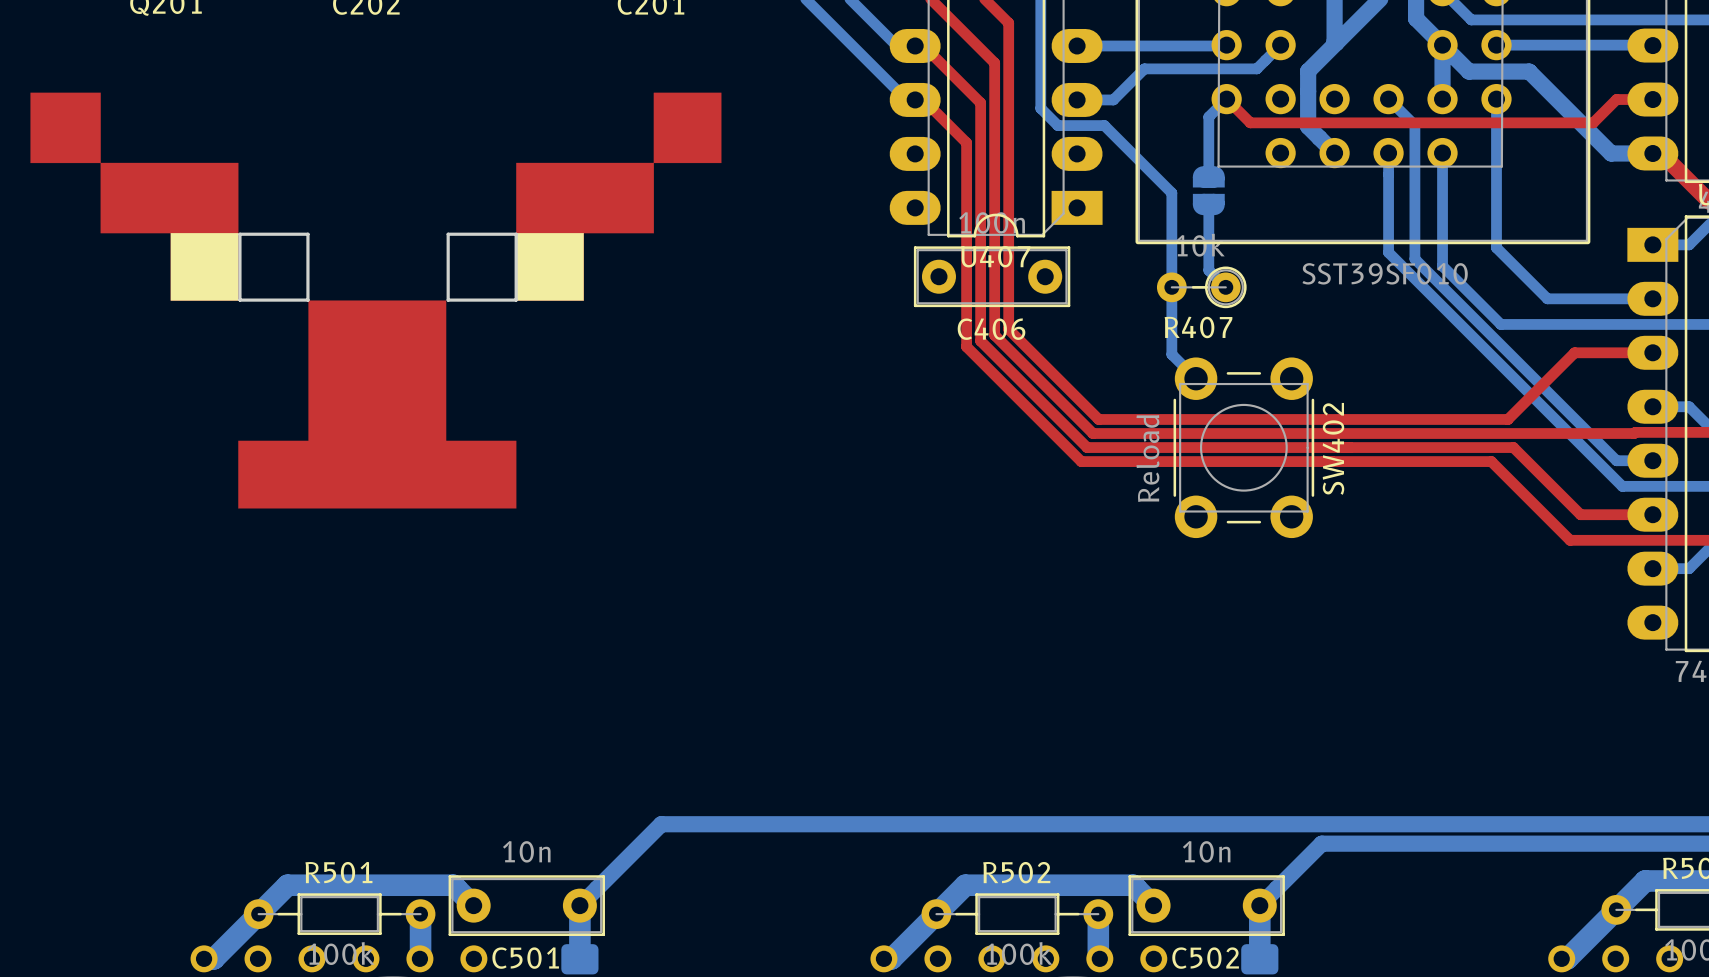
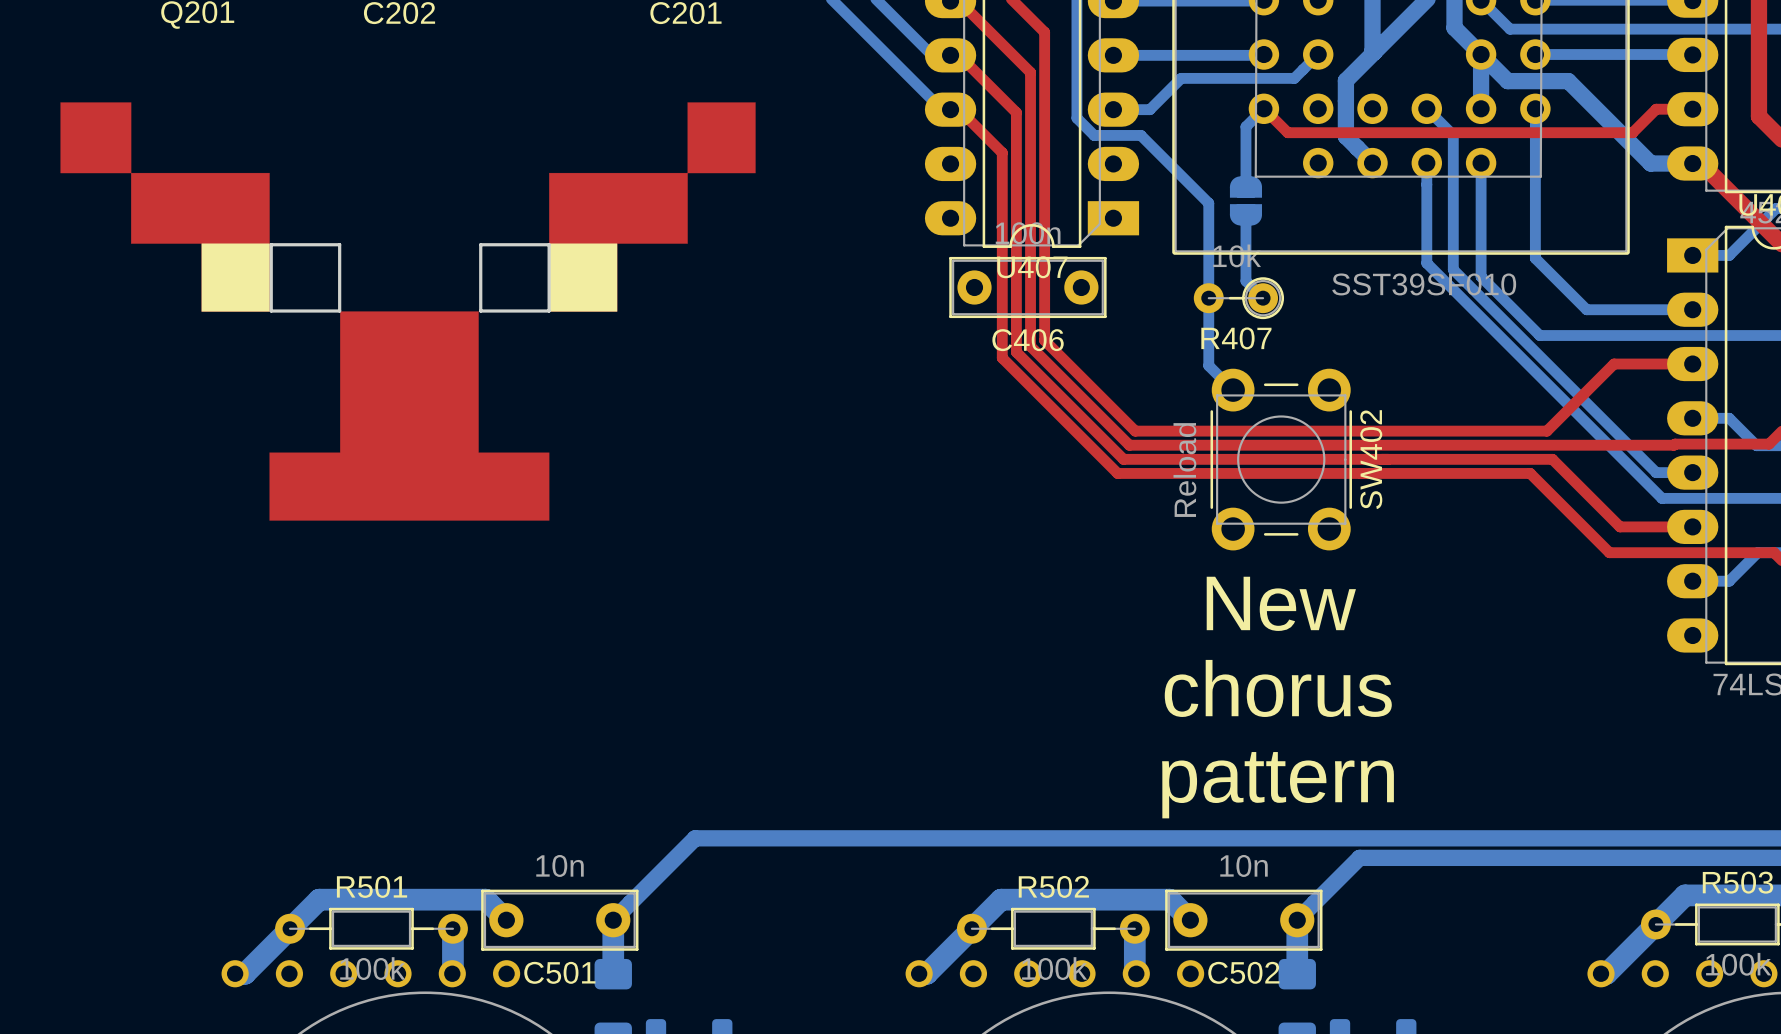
text: none -> New (1281, 603)
text: none -> chorus (1278, 688)
text: none -> pattern (1278, 785)

